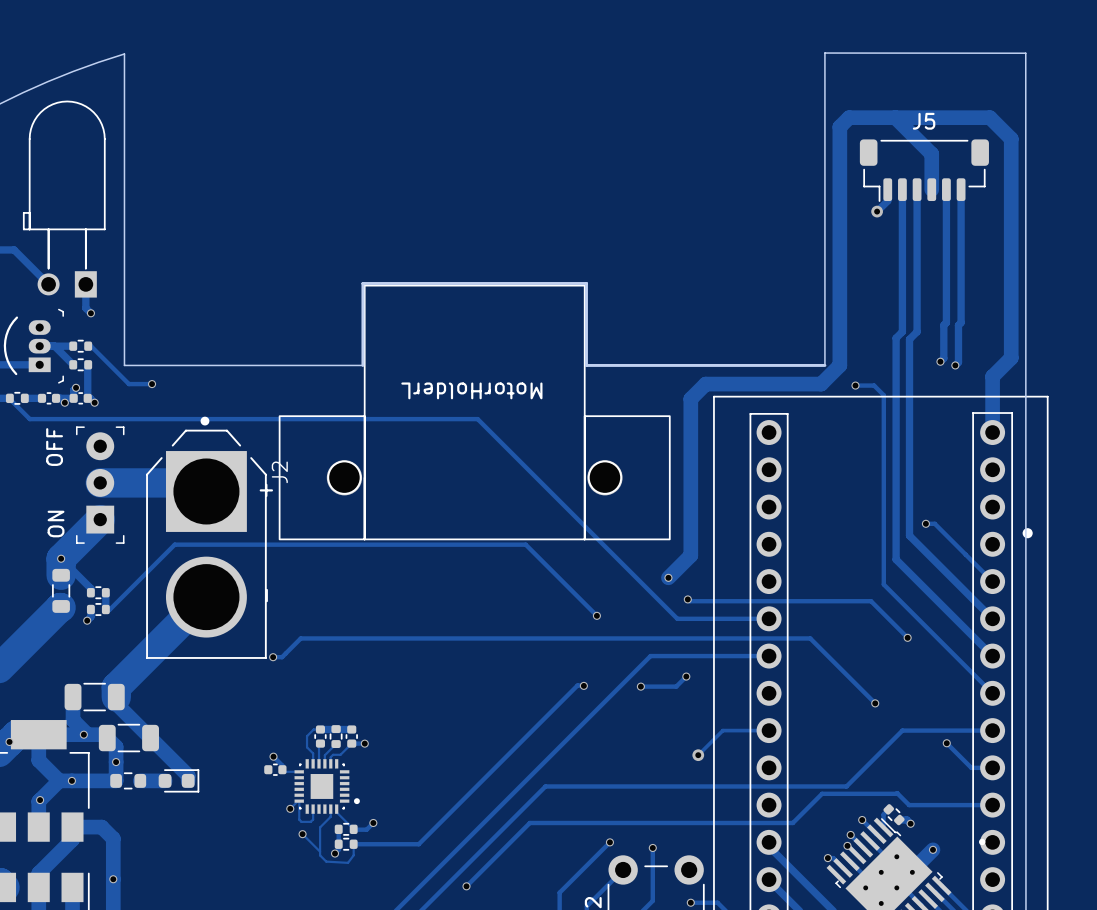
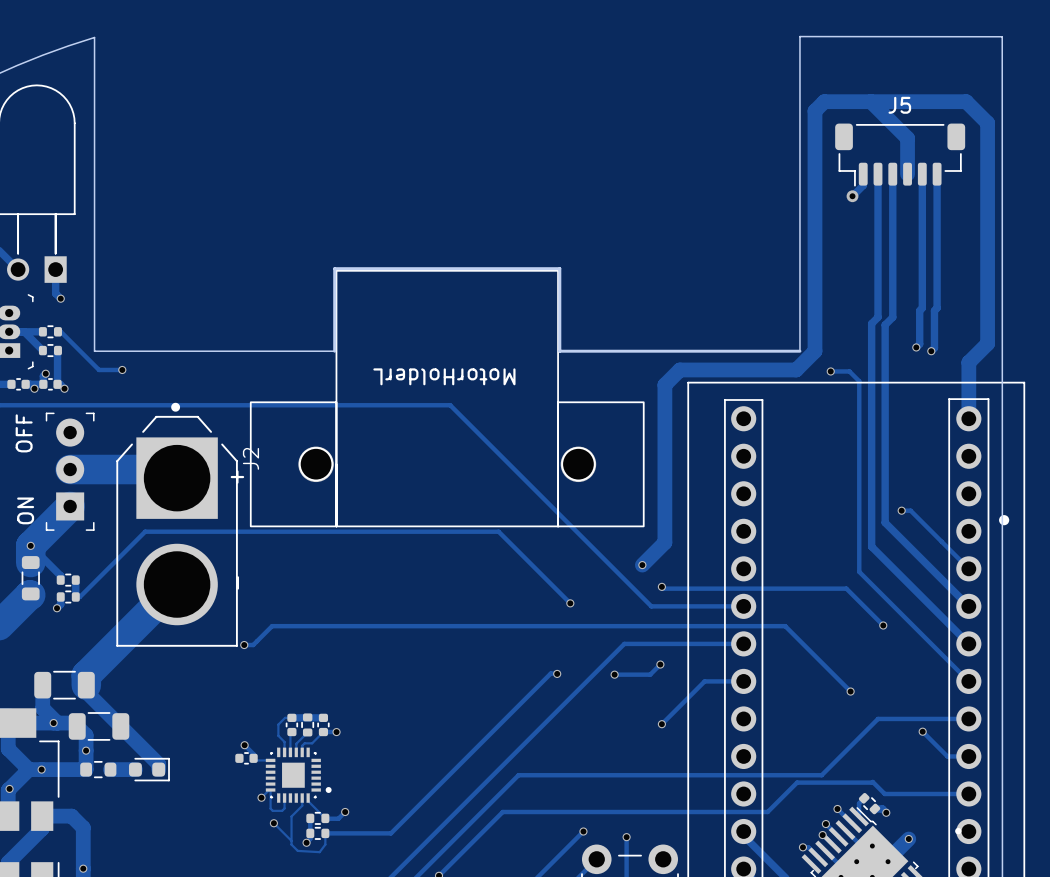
track: none -> (743, 681) (704, 681) (661, 724)
track: (769, 730) (722, 730) (698, 755) -> none
via: none -> (661, 724)
via: (698, 755) -> none

